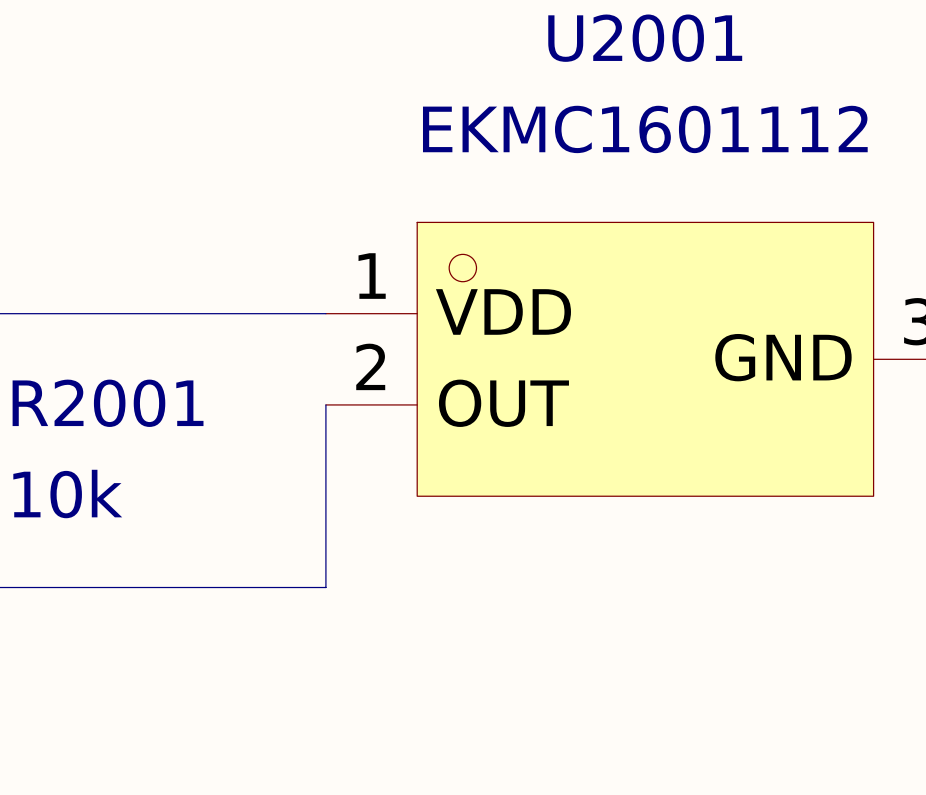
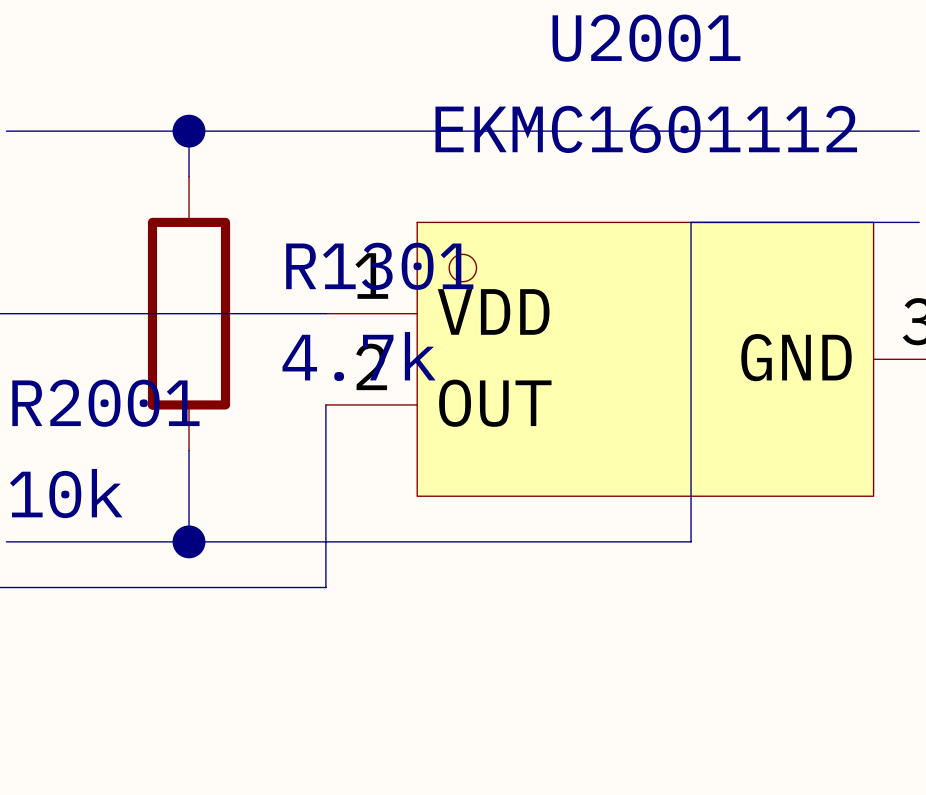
wire: none -> (6, 131) (919, 131)
wire: none -> (189, 131) (189, 176)
junction: none -> (189, 131)
wire: none -> (919, 222) (691, 222) (691, 541) (6, 541)
R1301: none -> 4.7k (189, 313)
wire: none -> (189, 450) (189, 541)
junction: none -> (189, 541)

